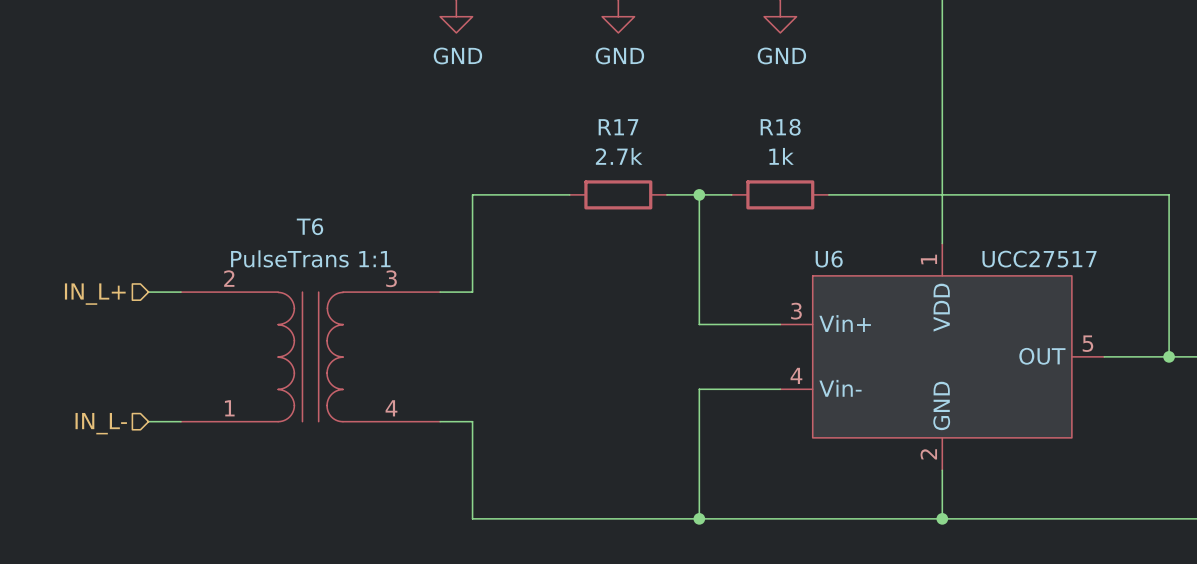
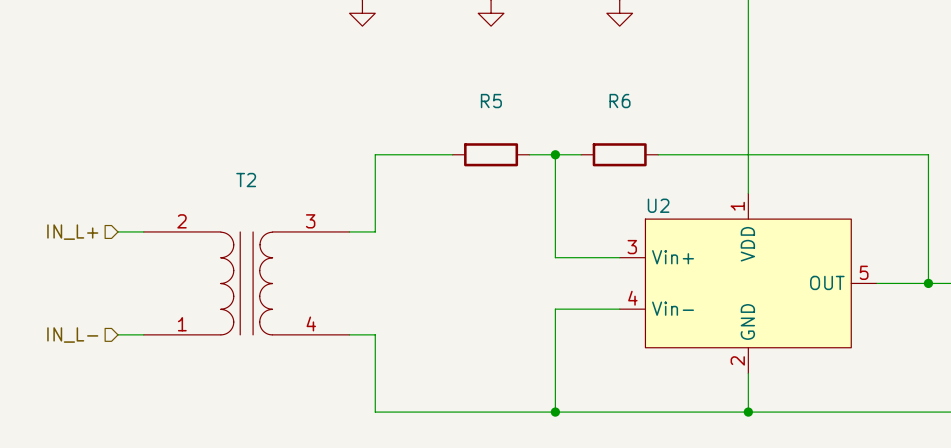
power symbol text: GND (457, 55) -> none
power symbol text: GND (619, 55) -> none
power symbol text: GND (781, 55) -> none
R17 name: R17 (618, 127) -> R5 (491, 101)
R18 name: R18 (780, 127) -> R6 (620, 101)
R17 value: 2.7k (619, 156) -> none
R18 value: 1k (781, 156) -> none
T6 name: T6 (310, 226) -> T2 (246, 180)
T6 value: PulseTrans 1:1 (310, 258) -> none
U6 name: U6 (829, 259) -> U2 (658, 205)
U6 value: UCC27517 (1039, 259) -> none

